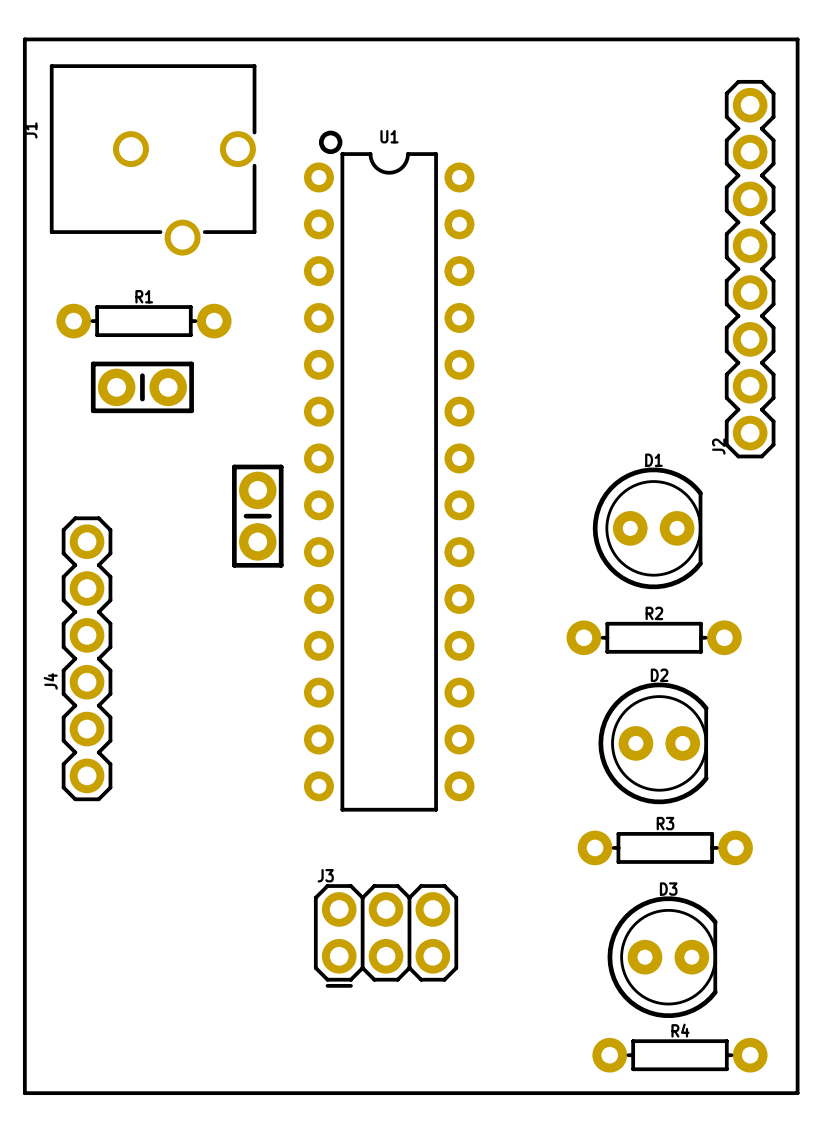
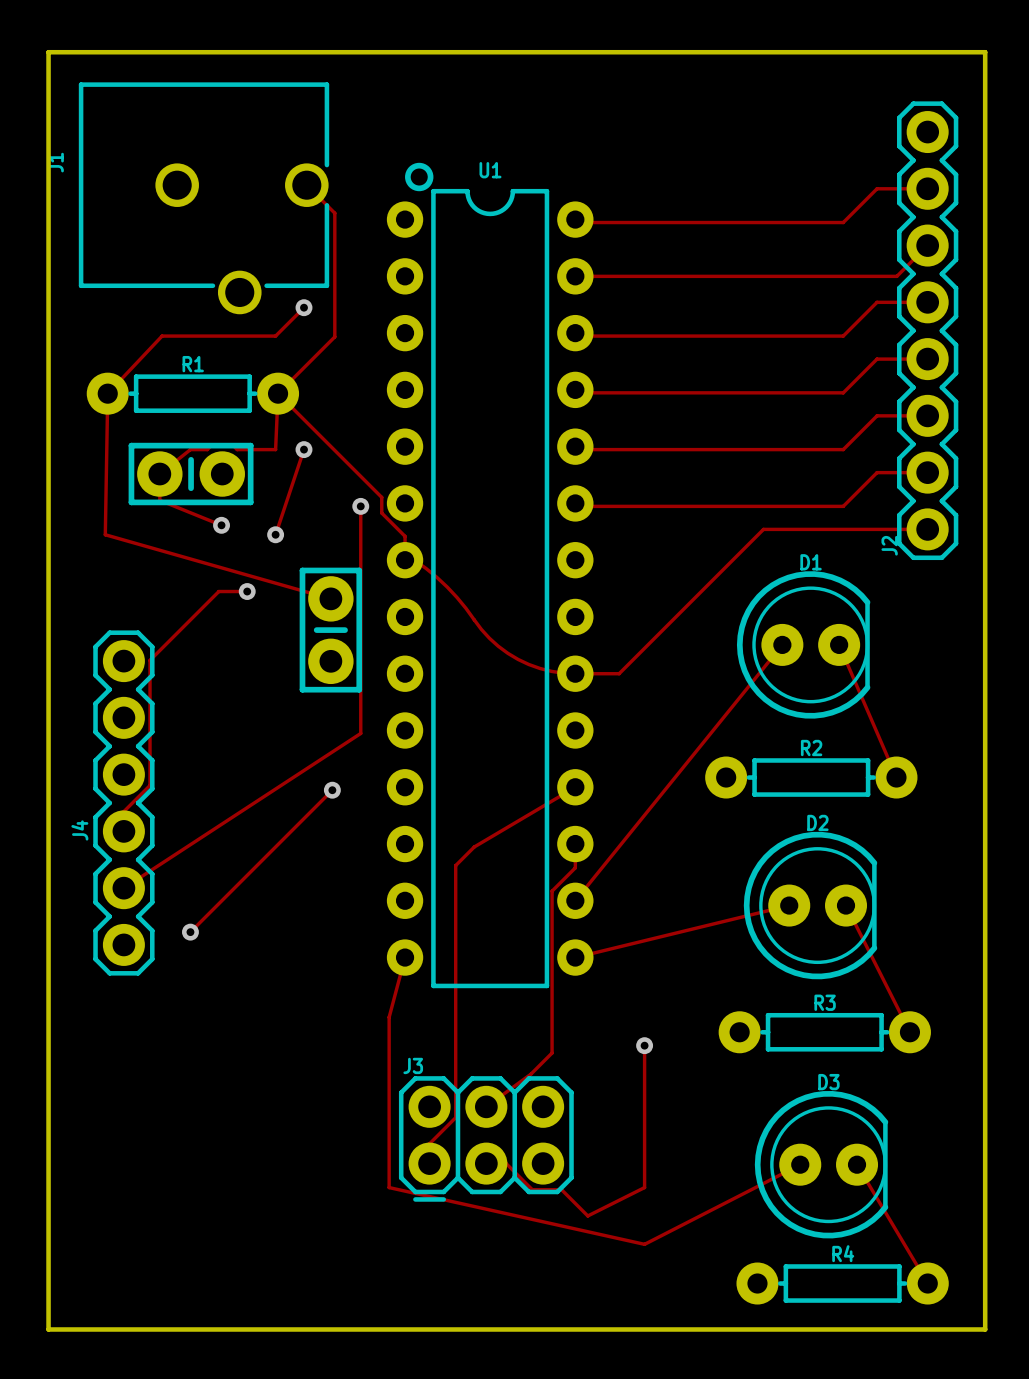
track: none -> (306, 185) (334, 213) (334, 336) (278, 393)
track: none -> (927, 188) (877, 188) (843, 222) (578, 222) (575, 219)
track: none -> (927, 245) (896, 276) (575, 276)
track: none -> (927, 302) (877, 302) (843, 336) (578, 336) (575, 333)
track: none -> (303, 307) (275, 336) (162, 336) (107, 393) (105, 534) (330, 598)
via: none -> (303, 307)
track: none -> (927, 359) (877, 359) (843, 392) (578, 392) (575, 389)
track: none -> (278, 393) (381, 497) (381, 513) (405, 536) (405, 560) (414, 560) (437, 577) (457, 597) (481, 629) (498, 646) (528, 664) (551, 671) (575, 673) (619, 673) (763, 529) (927, 529)
track: none -> (278, 393) (275, 449) (237, 449) (233, 446) (210, 446) (207, 449) (190, 449) (159, 474) (159, 500) (221, 525)
track: none -> (927, 415) (877, 415) (843, 449) (578, 449) (575, 446)
track: none -> (303, 449) (275, 534)
via: none -> (303, 449)
track: none -> (927, 472) (877, 472) (843, 506) (578, 506) (575, 503)
track: none -> (360, 506) (360, 733) (123, 888)
via: none -> (360, 506)
via: none -> (221, 525)
via: none -> (275, 534)
track: none -> (247, 591) (218, 591) (150, 660) (150, 785) (123, 811) (123, 831)
via: none -> (247, 591)
track: none -> (782, 644) (575, 900)
track: none -> (839, 644) (896, 777)
track: none -> (575, 787) (474, 846) (455, 865) (455, 1117) (429, 1143) (429, 1163)
track: none -> (332, 790) (190, 932)
via: none -> (332, 790)
track: none -> (575, 844) (575, 867) (552, 891) (552, 1053) (531, 1074) (486, 1106)
track: none -> (789, 905) (575, 957)
track: none -> (846, 905) (909, 1032)
via: none -> (190, 932)
track: none -> (405, 957) (389, 1017) (389, 1187) (644, 1244) (800, 1164)
track: none -> (644, 1045) (644, 1187) (587, 1215) (561, 1189) (532, 1189) (506, 1163) (486, 1163)
via: none -> (644, 1045)
track: none -> (857, 1164) (927, 1283)

